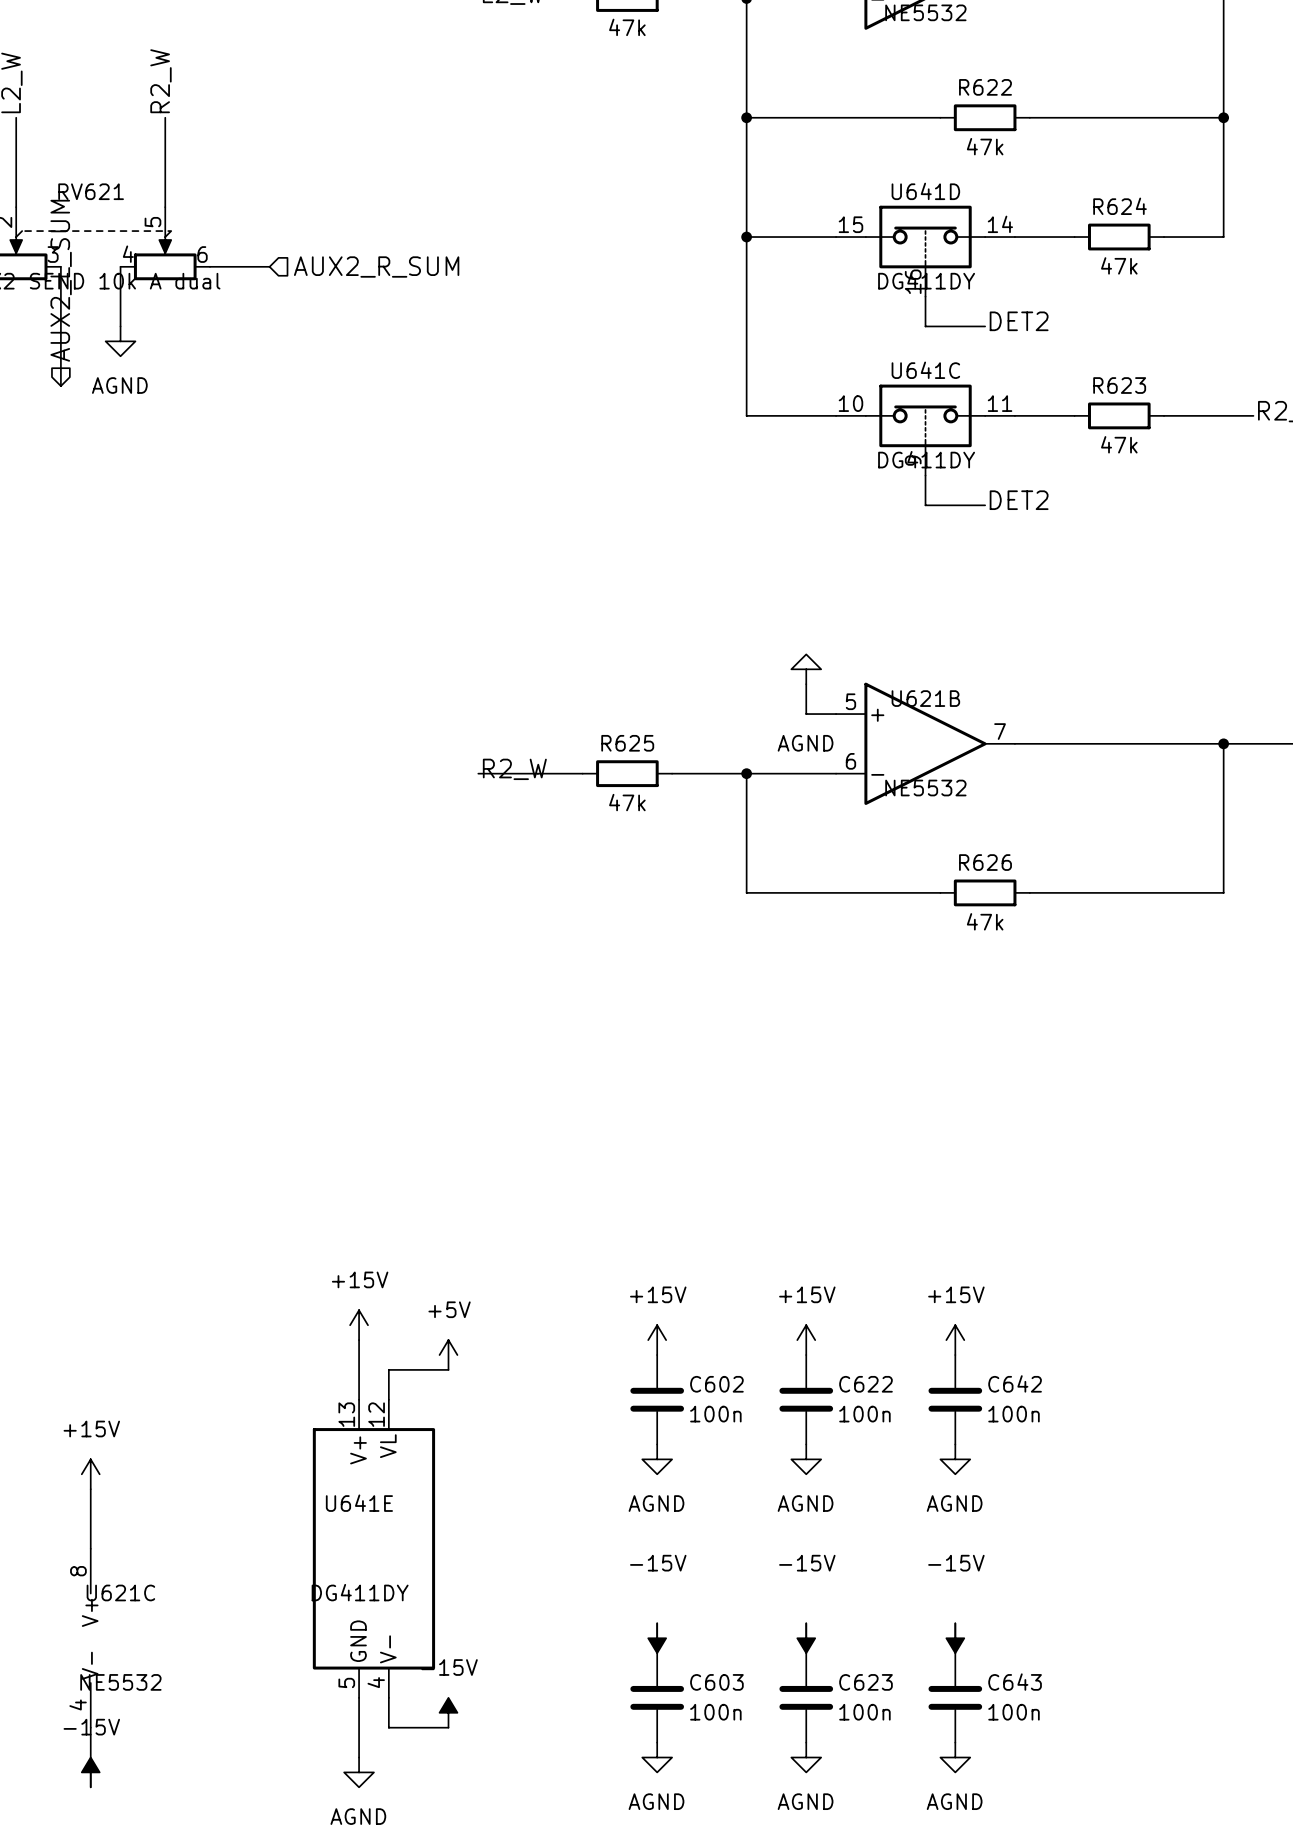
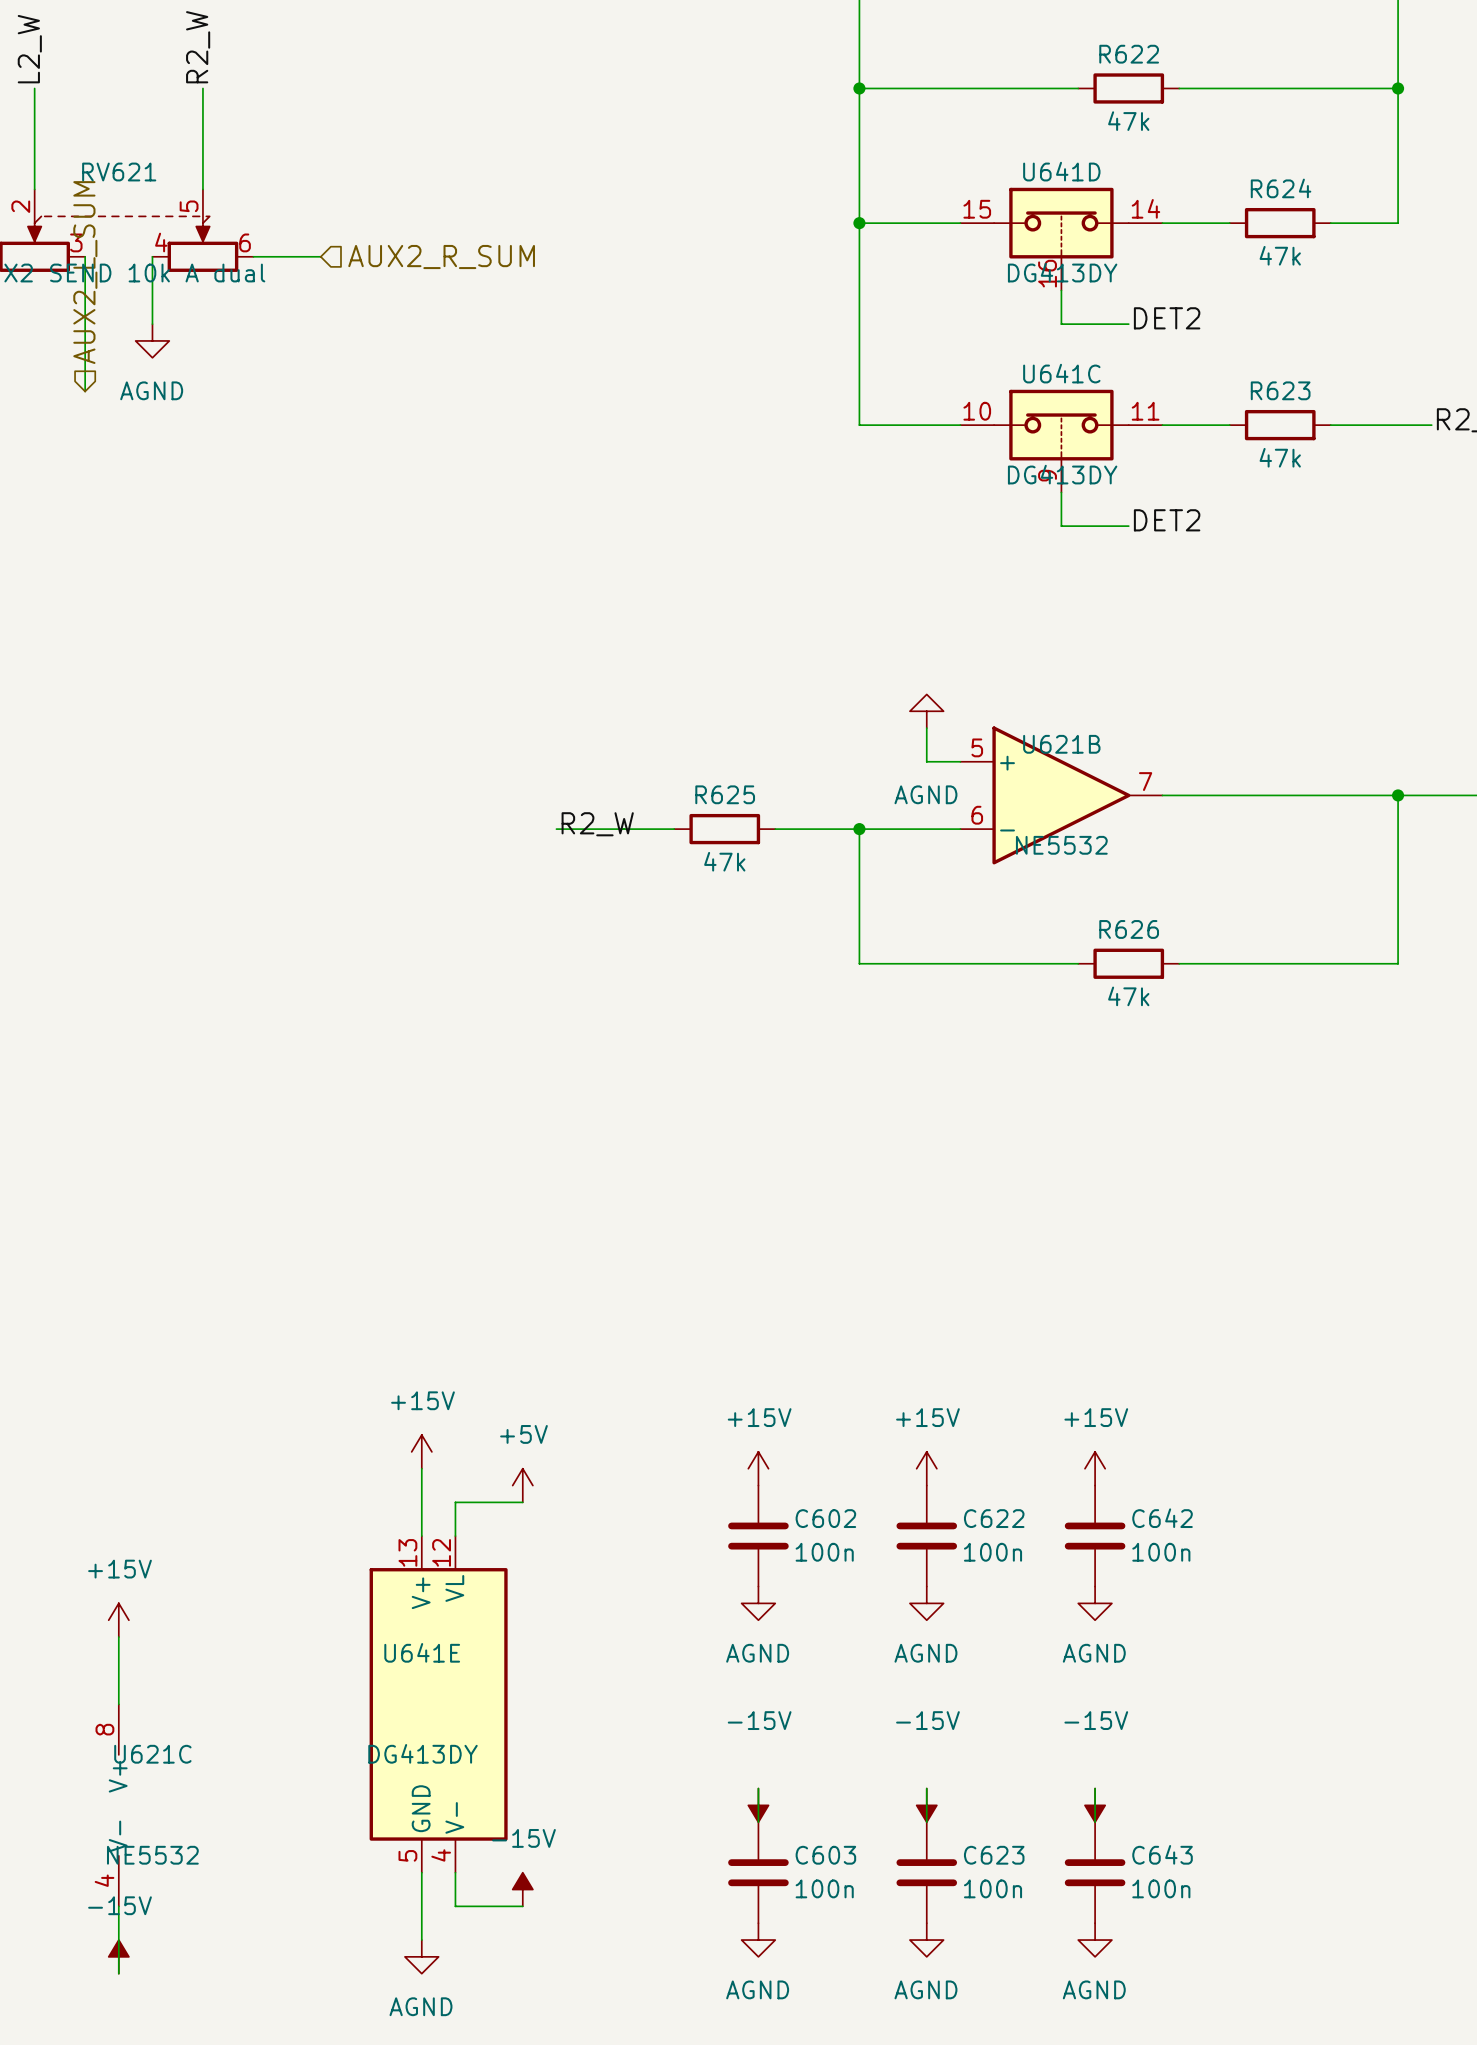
U641D value: DG411DY (926, 280) -> DG413DY (1062, 272)
U641C value: DG411DY (926, 459) -> DG413DY (1062, 474)
U641E value: DG411DY (360, 1592) -> DG413DY (422, 1753)

